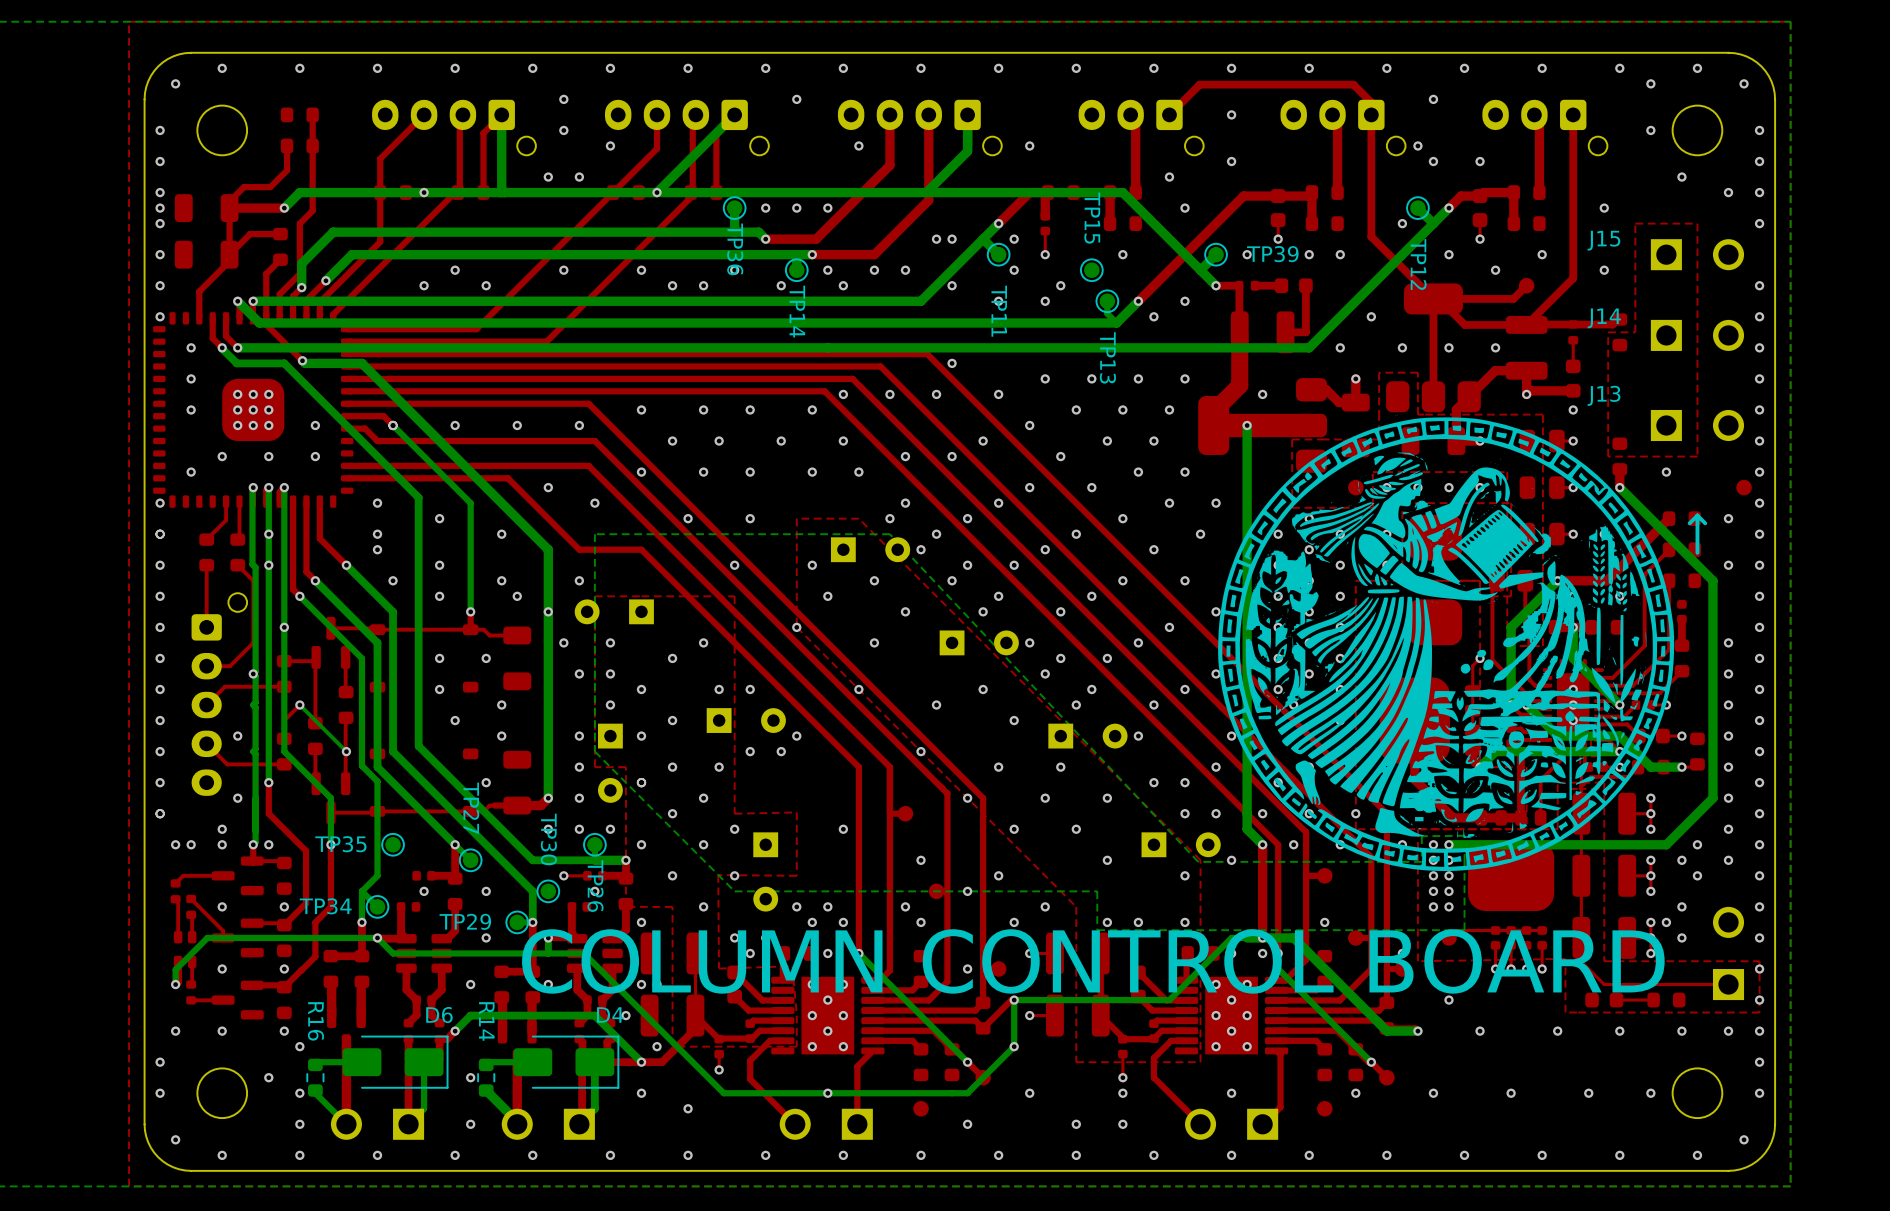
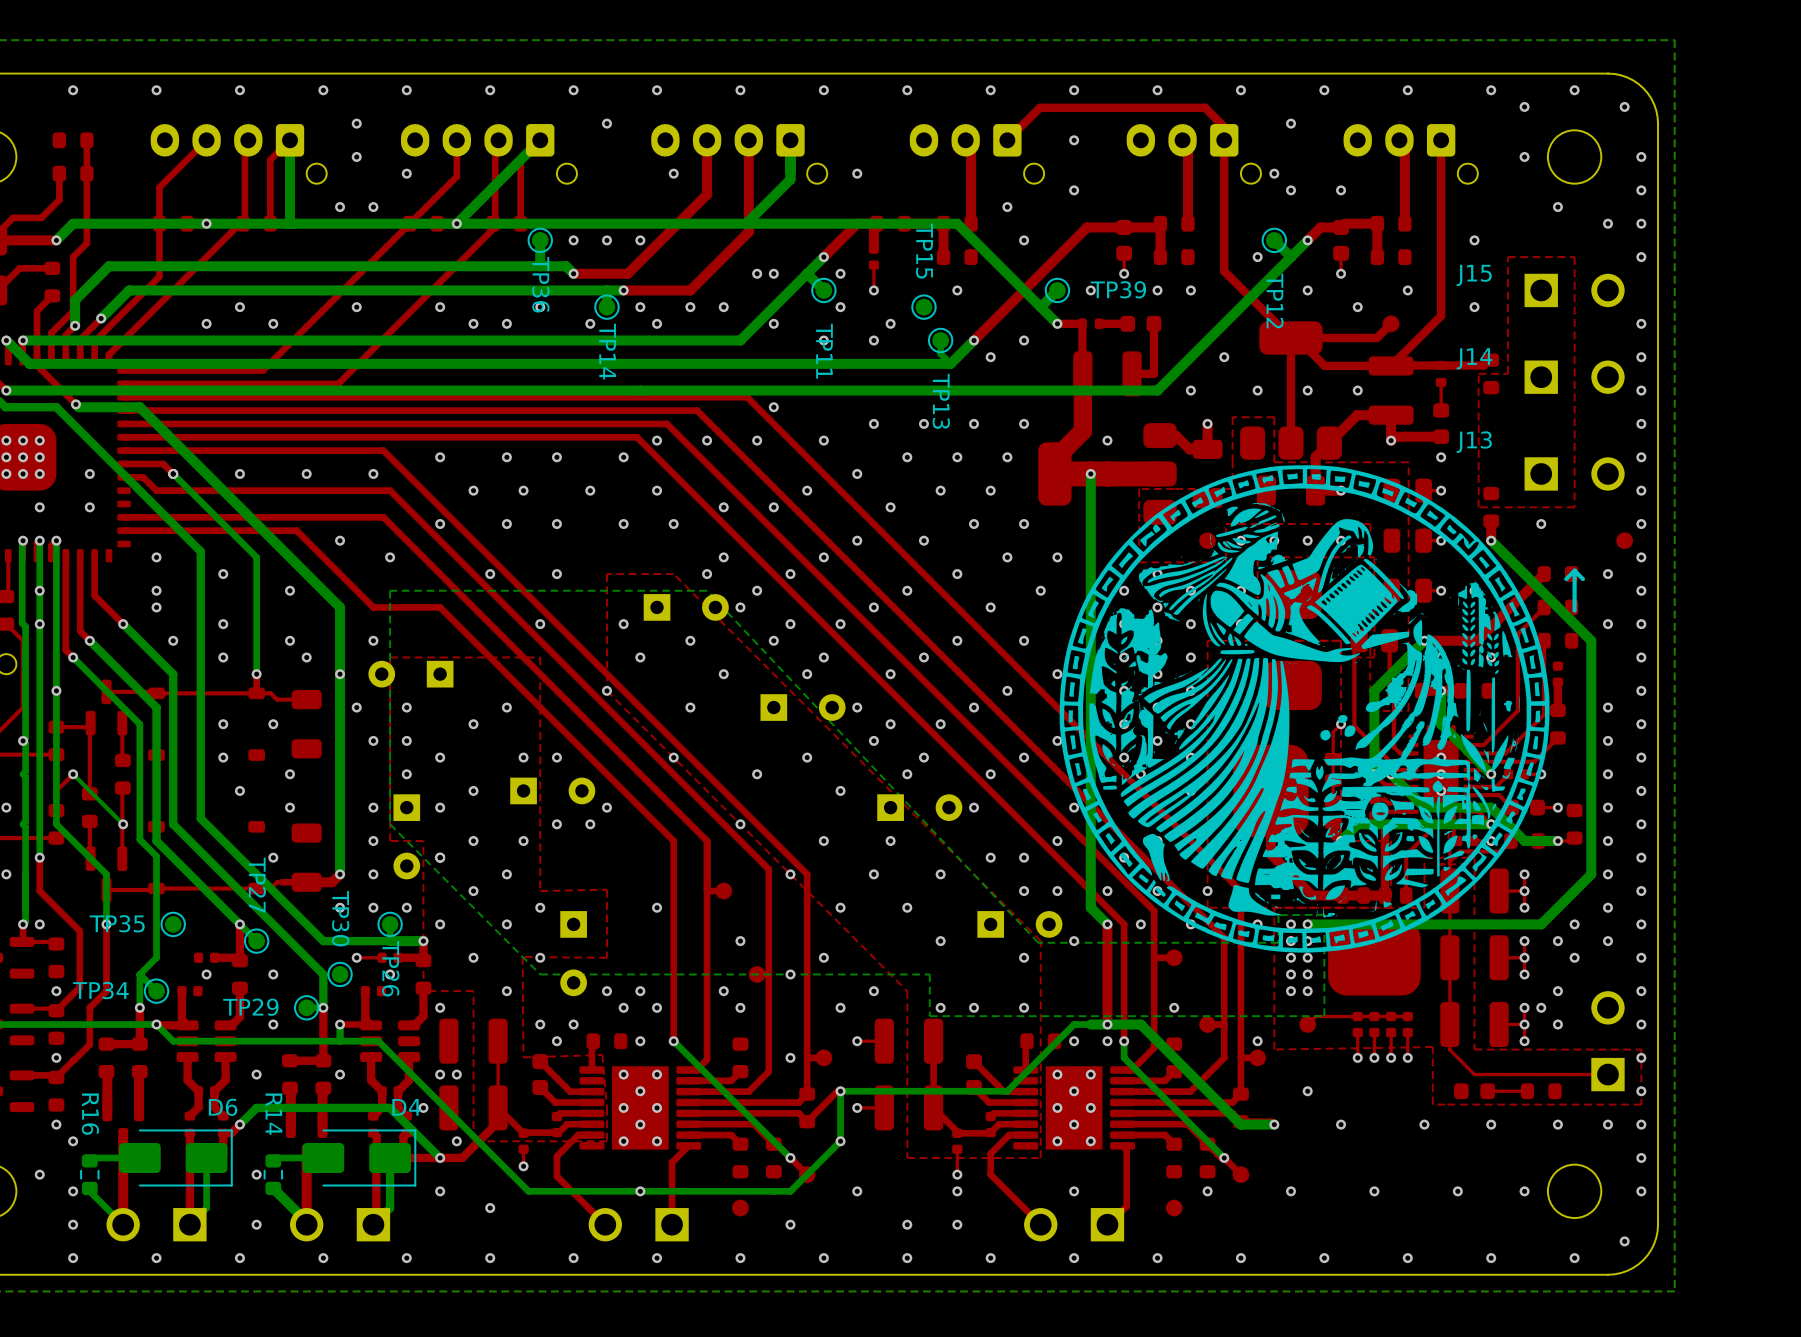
text: COLUMN CONTROL BOARD (1093, 961) -> none

